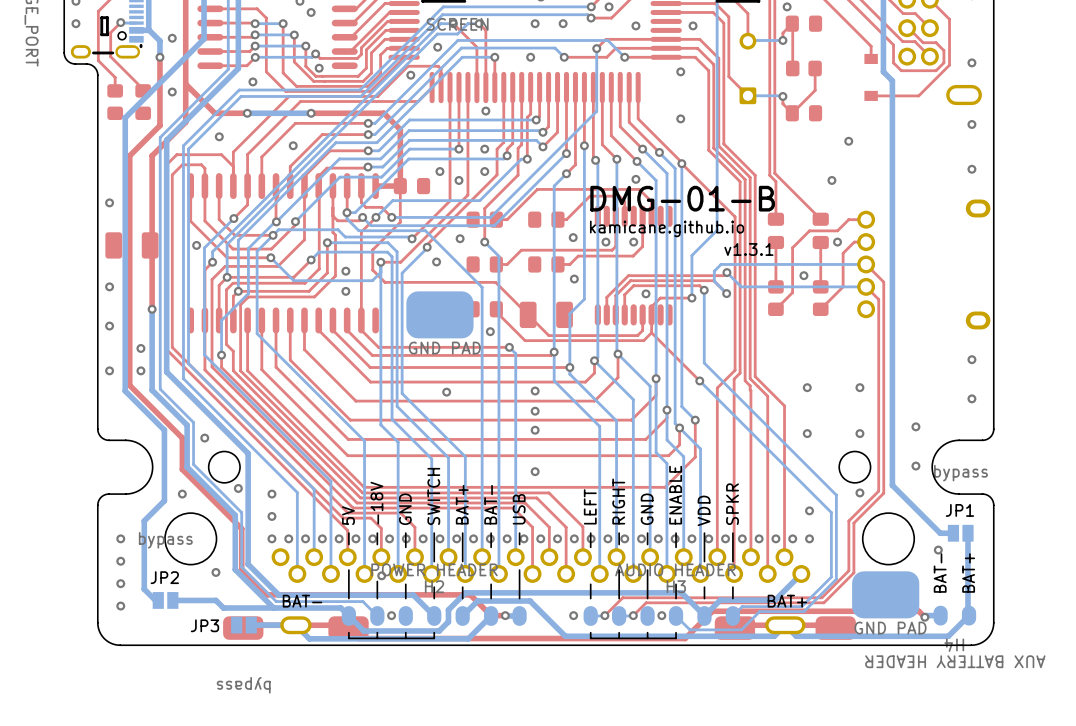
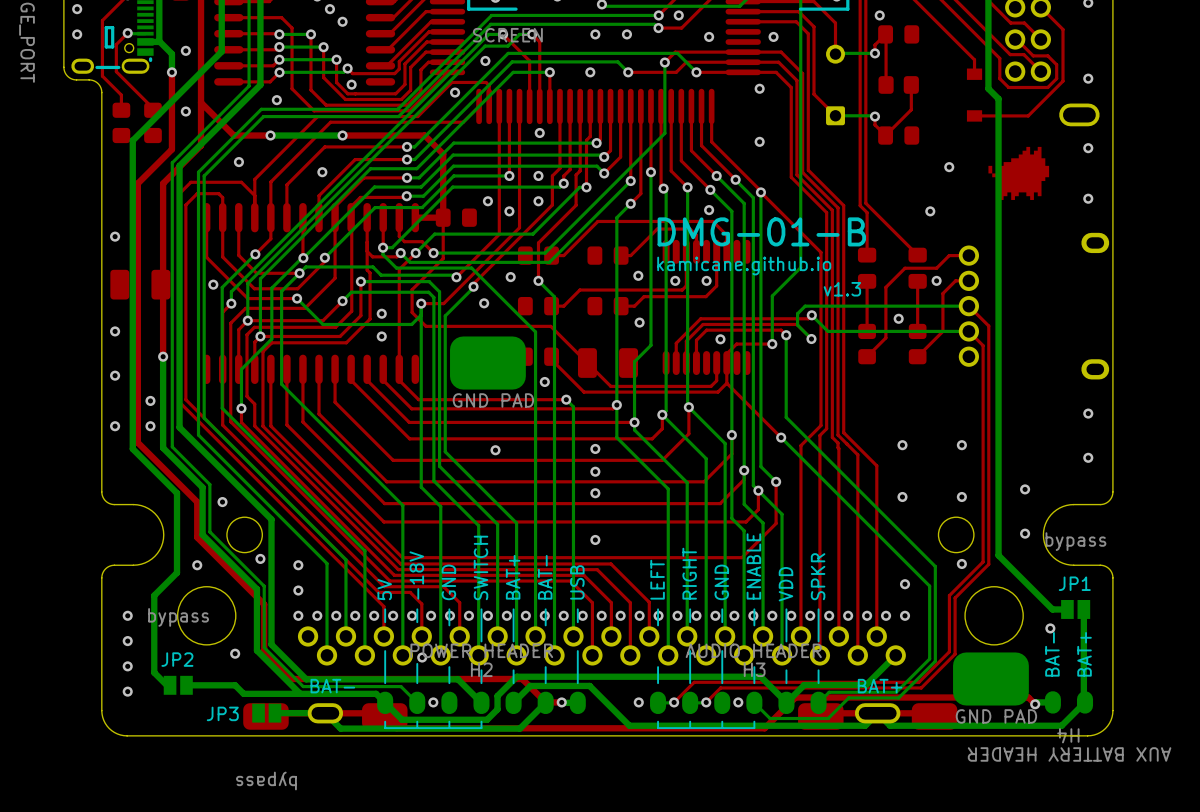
drawing: none -> [988, 146, 1050, 200]
text: v1.3.1 (748, 249) -> v1.3 (842, 289)

